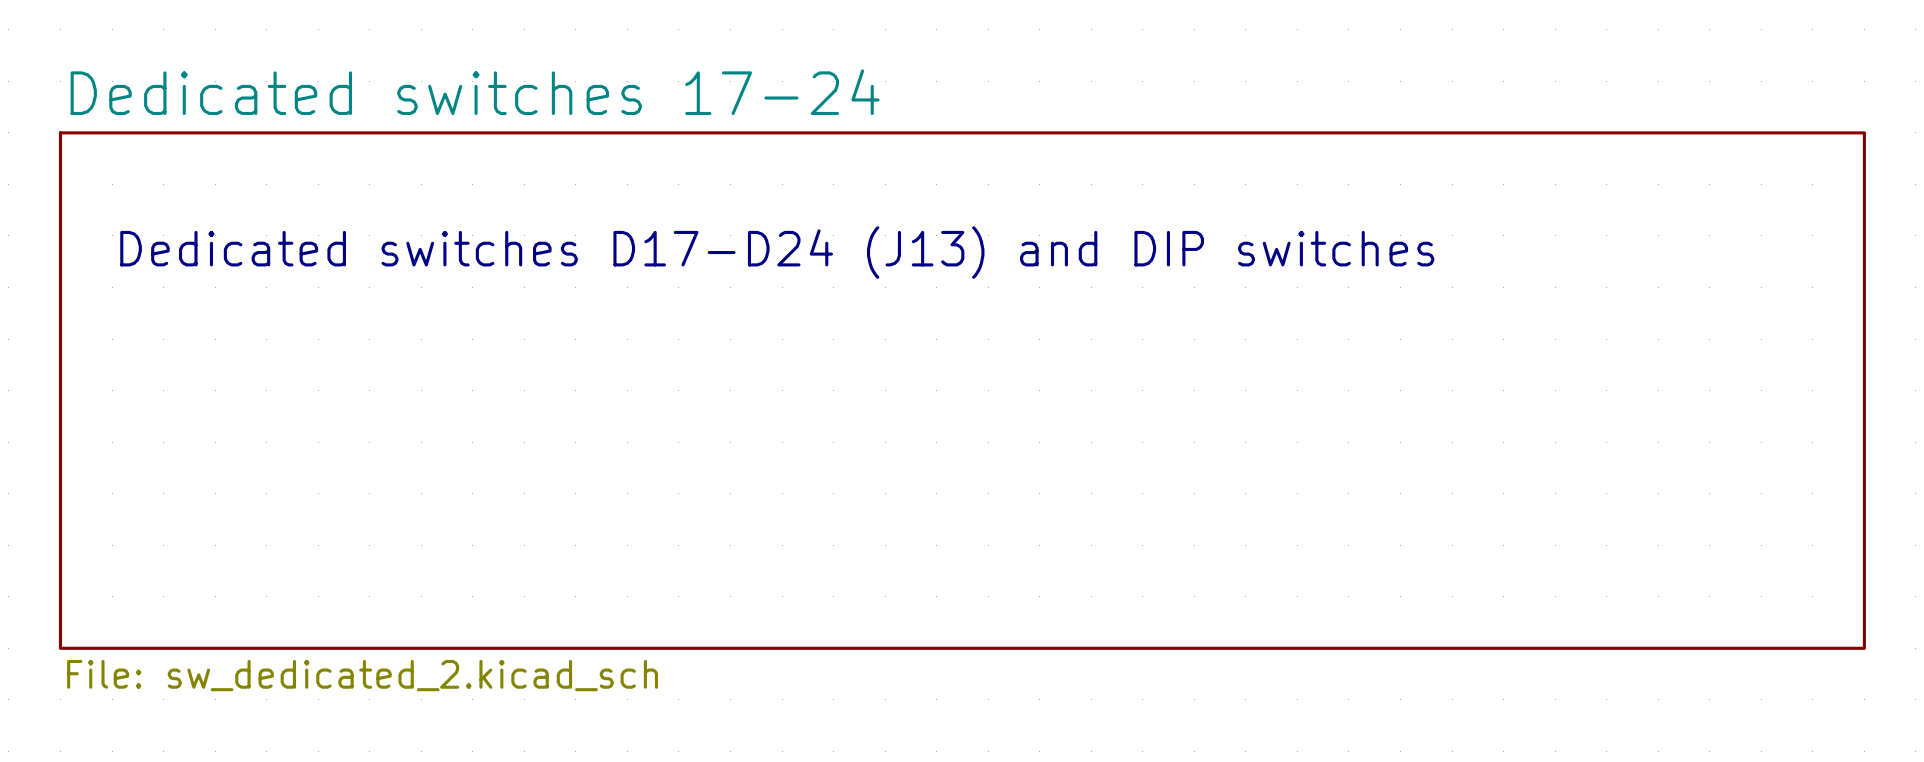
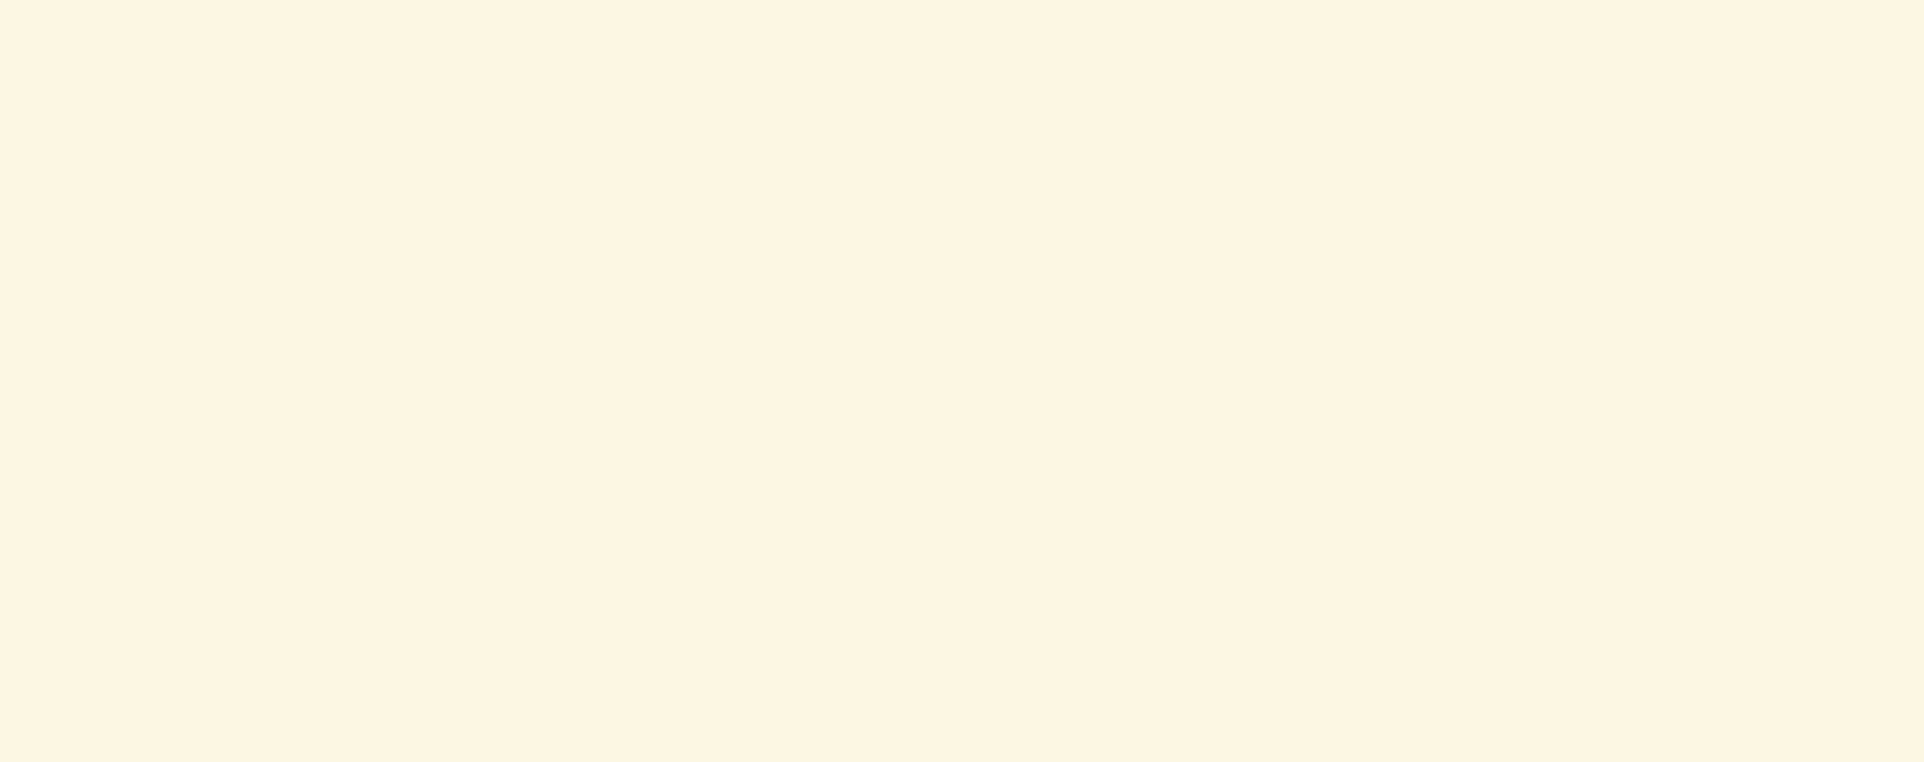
text: Dedicated switches D17-D24 (J13) and DIP switches (777, 252) -> none
sheet Dedicated switches 17-24: File: sw_dedicated_2.kicad_sch (962, 390) -> none

